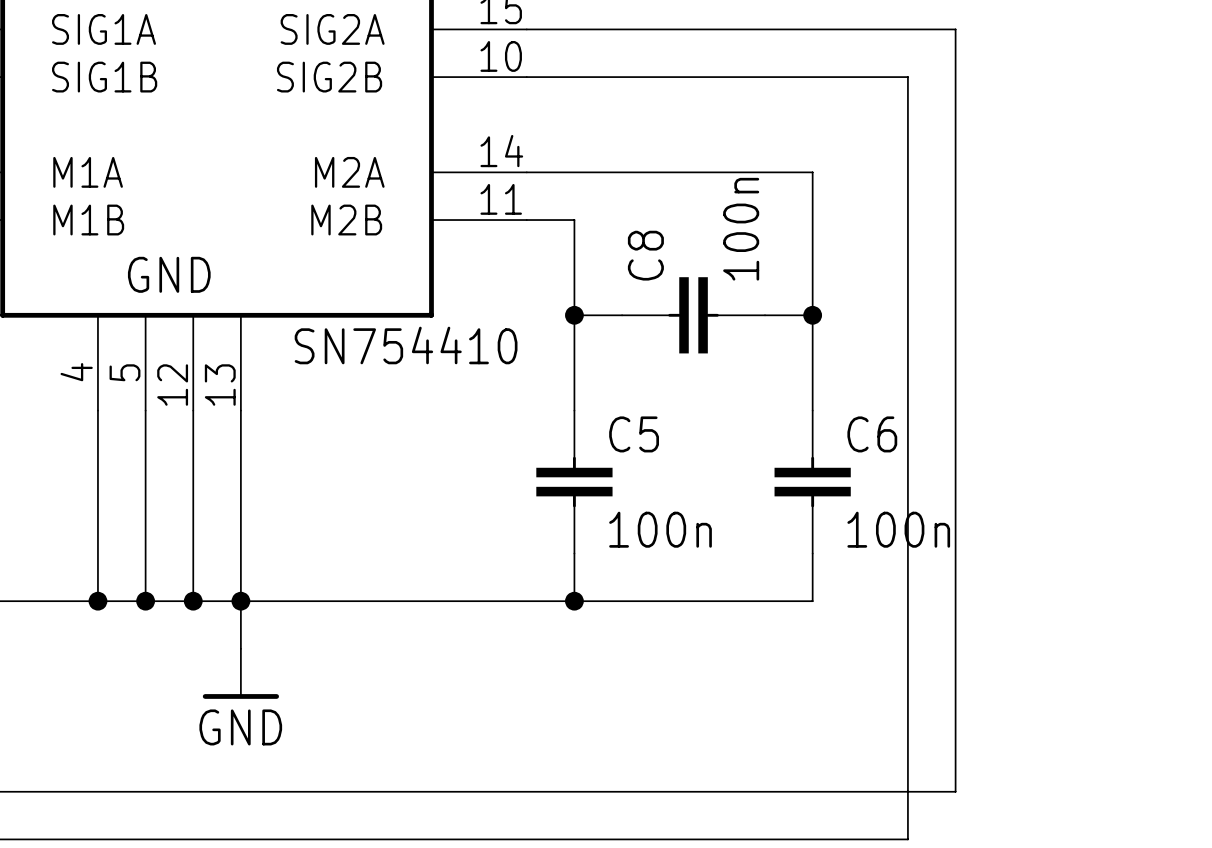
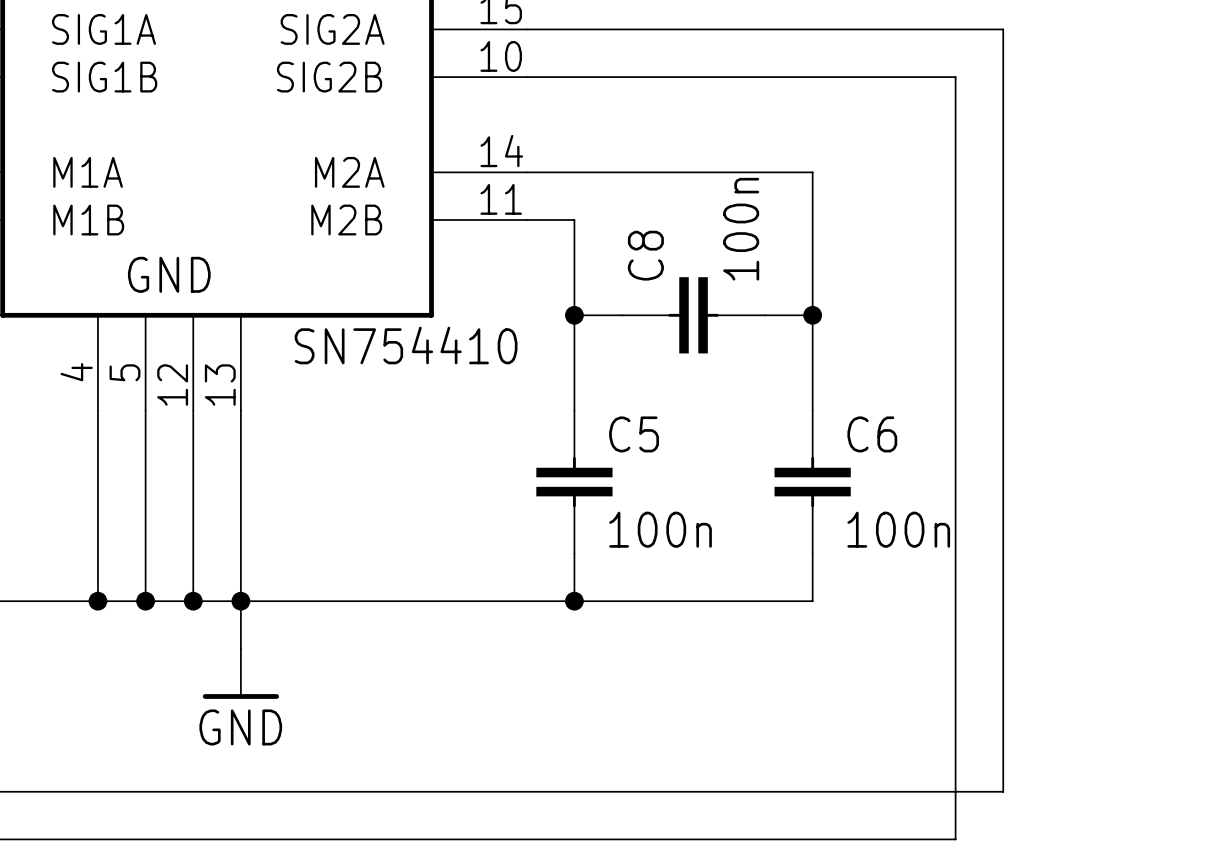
wire: (955, 29) (955, 77) -> (907, 77) (955, 77)
wire: (907, 77) (907, 839) -> (955, 29) (1003, 29) (1003, 791) (955, 791) (955, 839) (907, 839)

